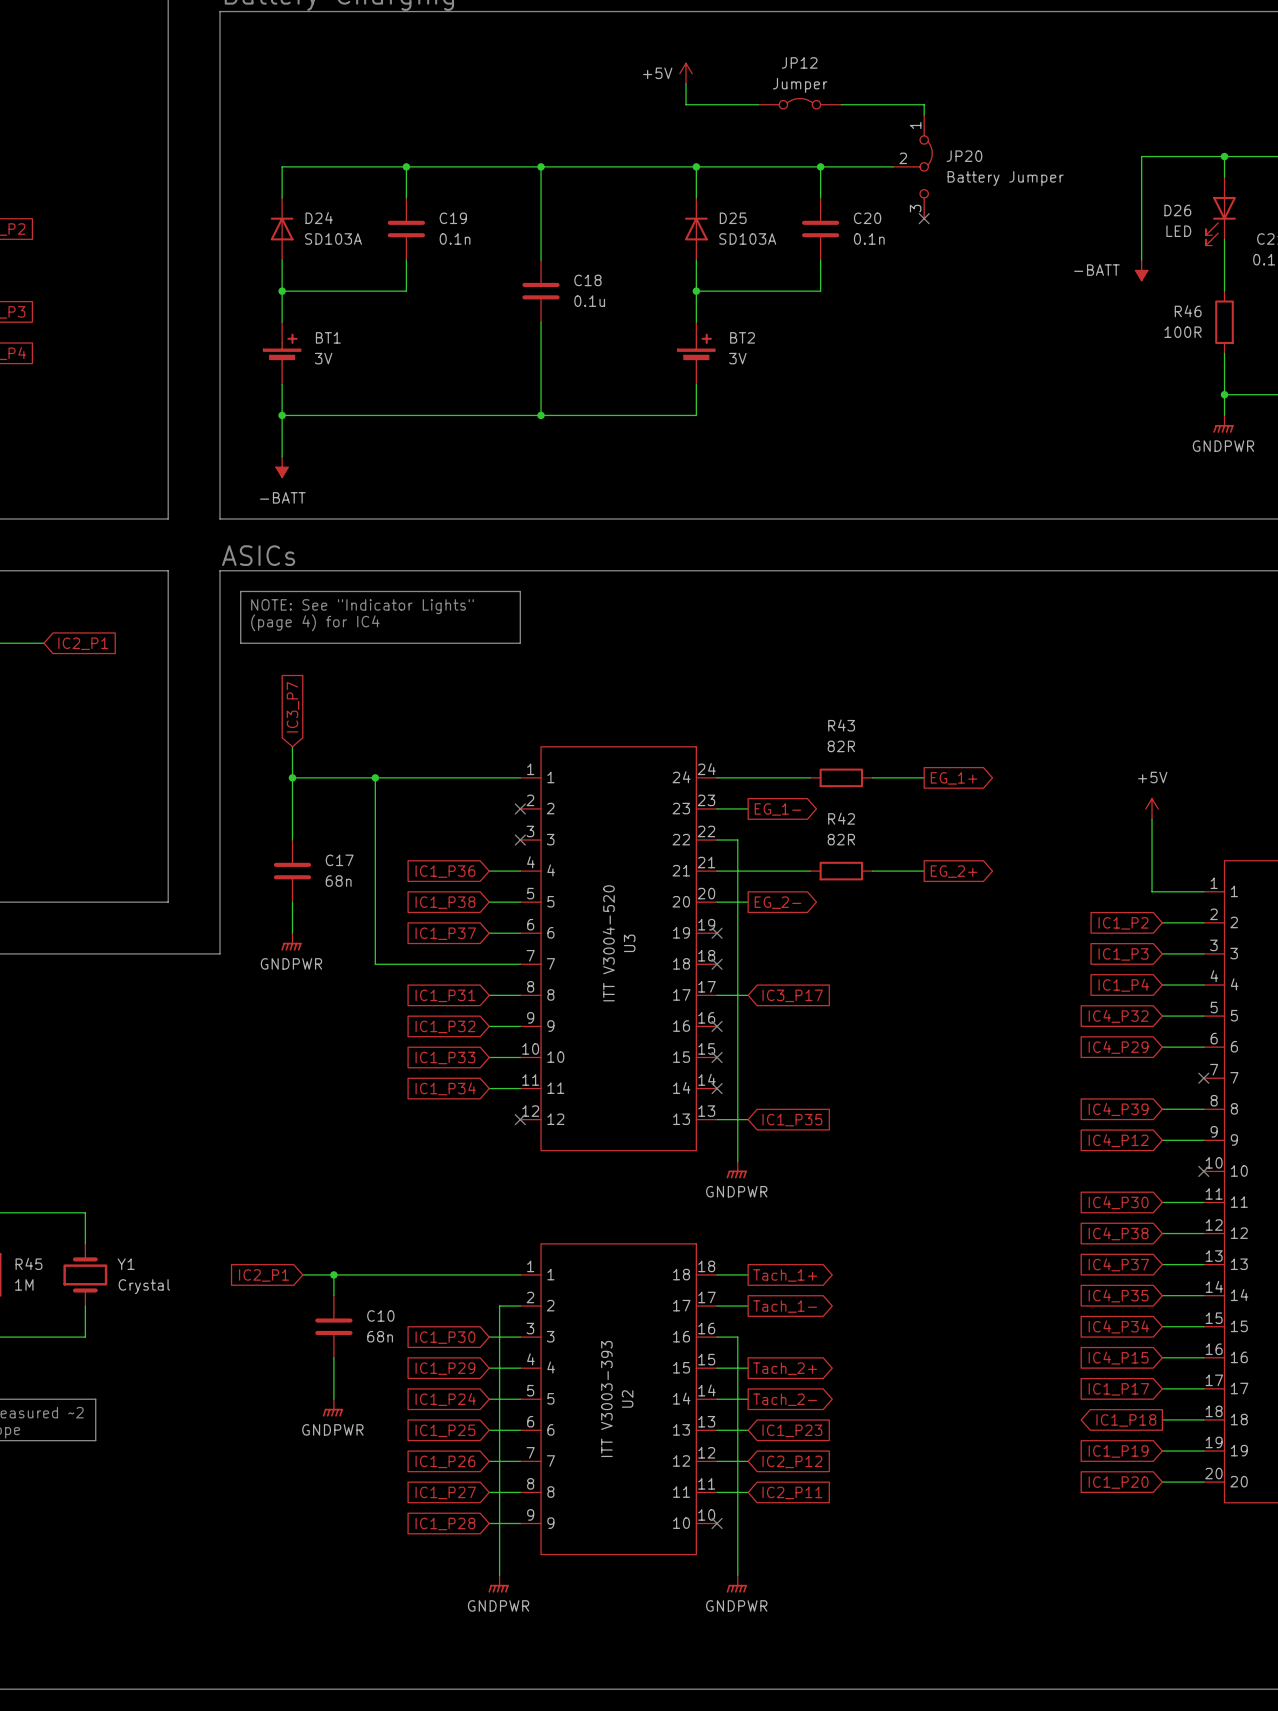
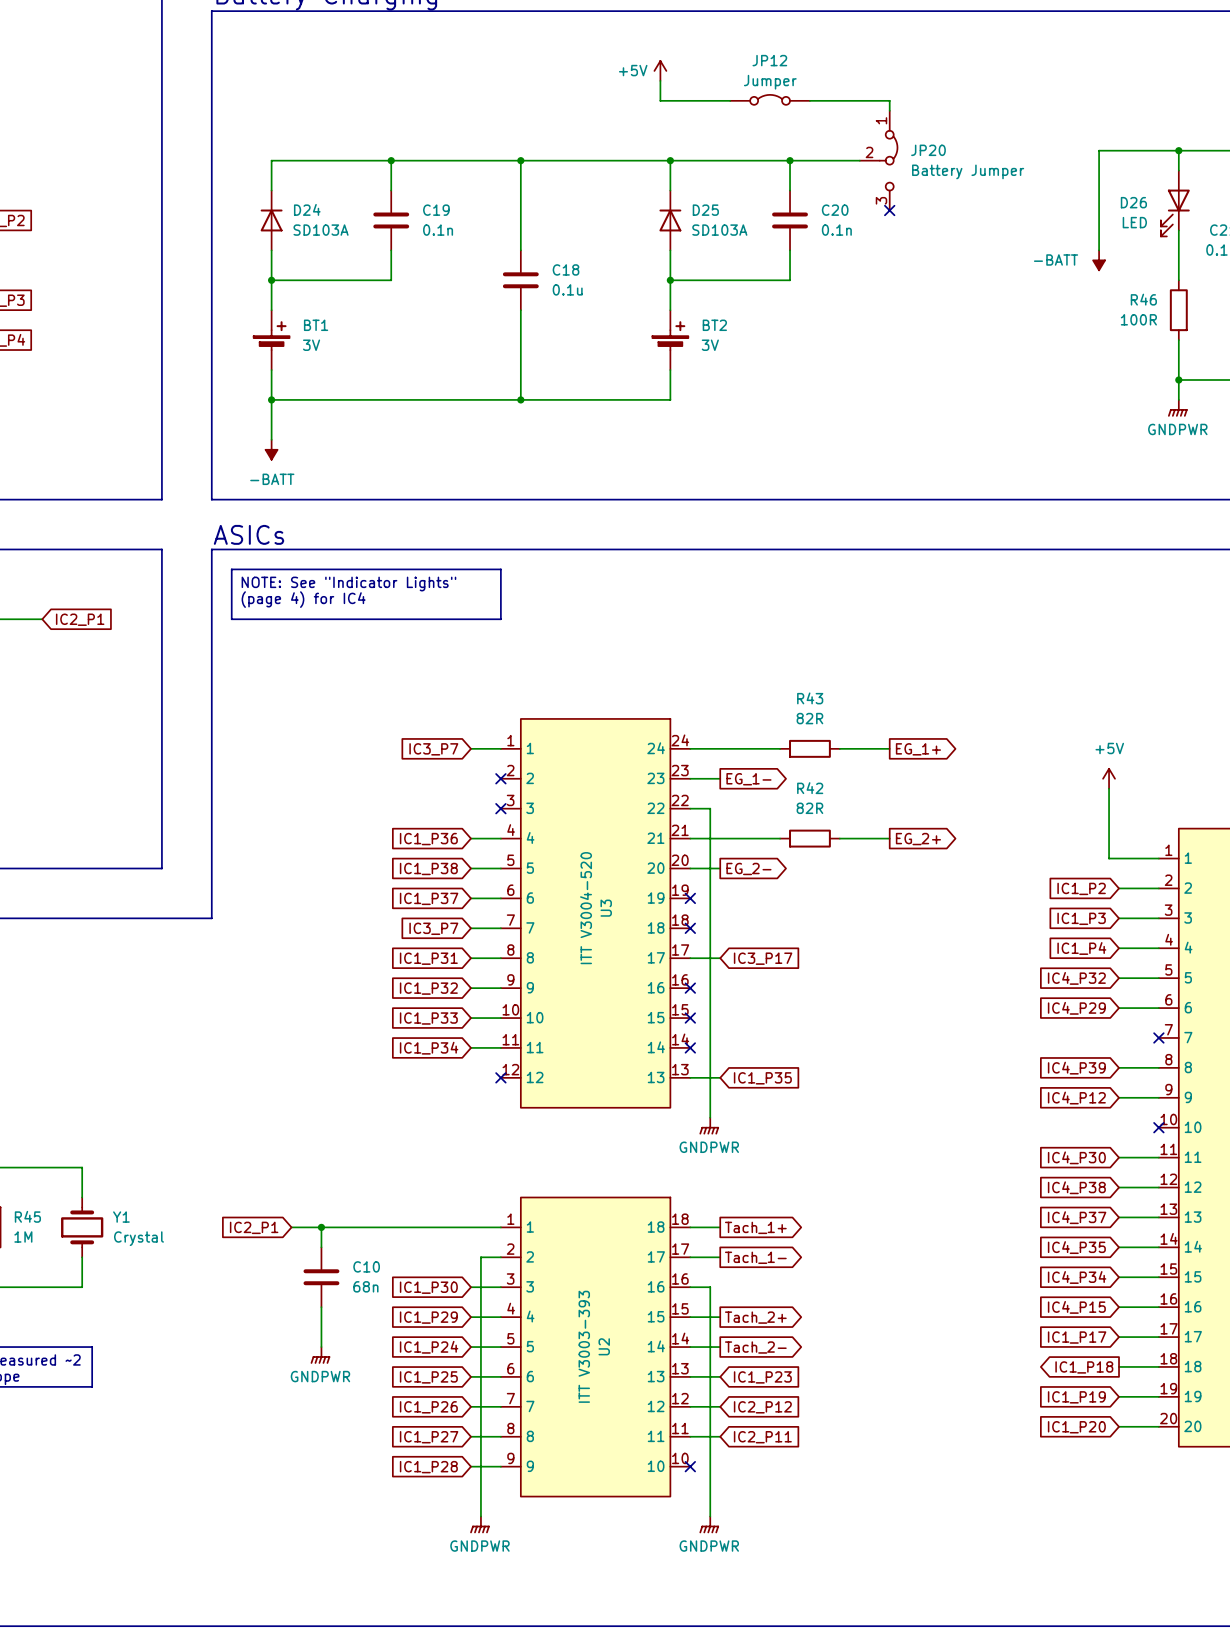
global label: IC3_P7 (292, 707) -> none
wire: (292, 746) (292, 840) -> none
wire: (292, 777) (489, 777) -> none
junction: (292, 777) -> none
wire: (375, 777) (375, 964) (489, 964) -> none
junction: (375, 777) -> none
global label: none -> IC3_P7 (433, 749)
C17: 68n (292, 871) -> none
wire: (292, 902) (292, 933) -> none
power symbol: GNDPWR (291, 941) -> none
global label: none -> IC3_P7 (433, 928)

